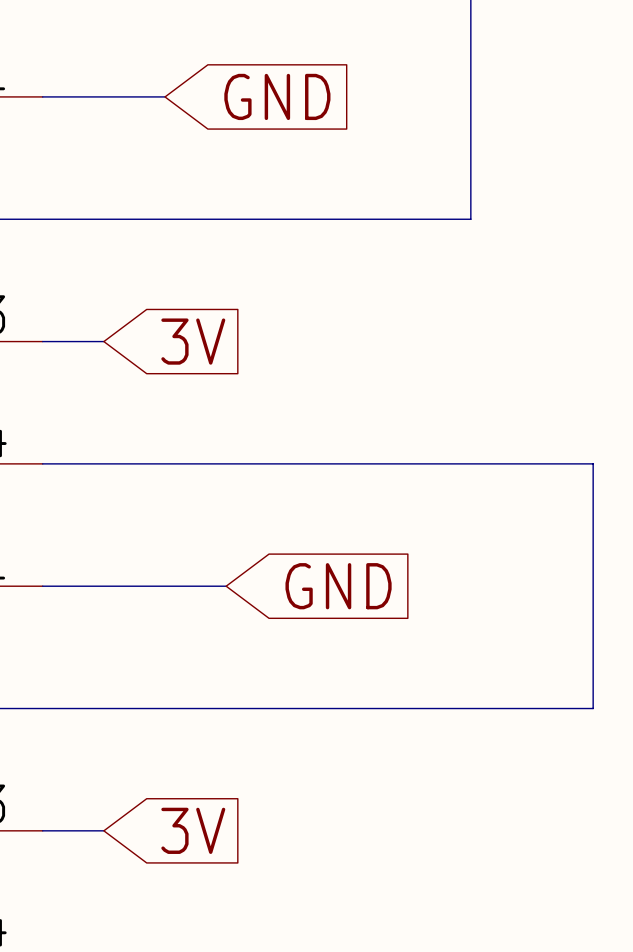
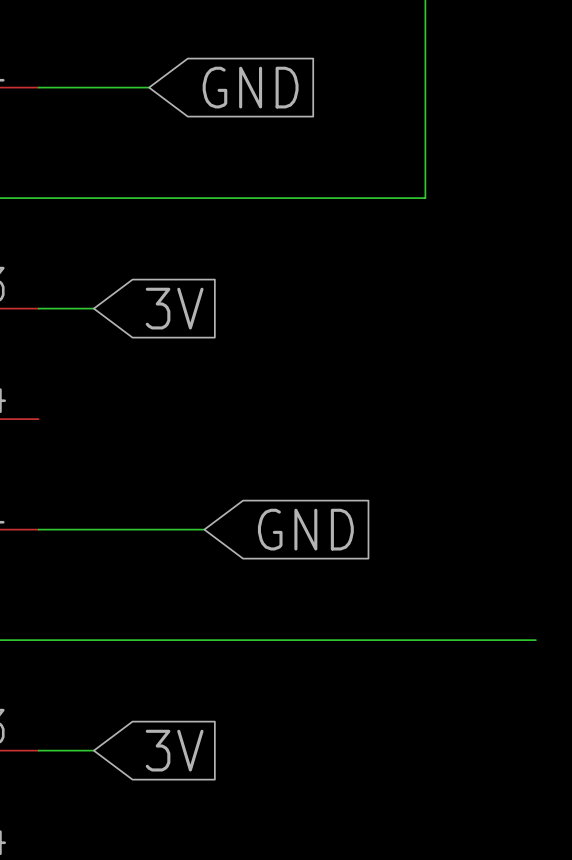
wire: (42, 463) (593, 463) (593, 708) -> none

